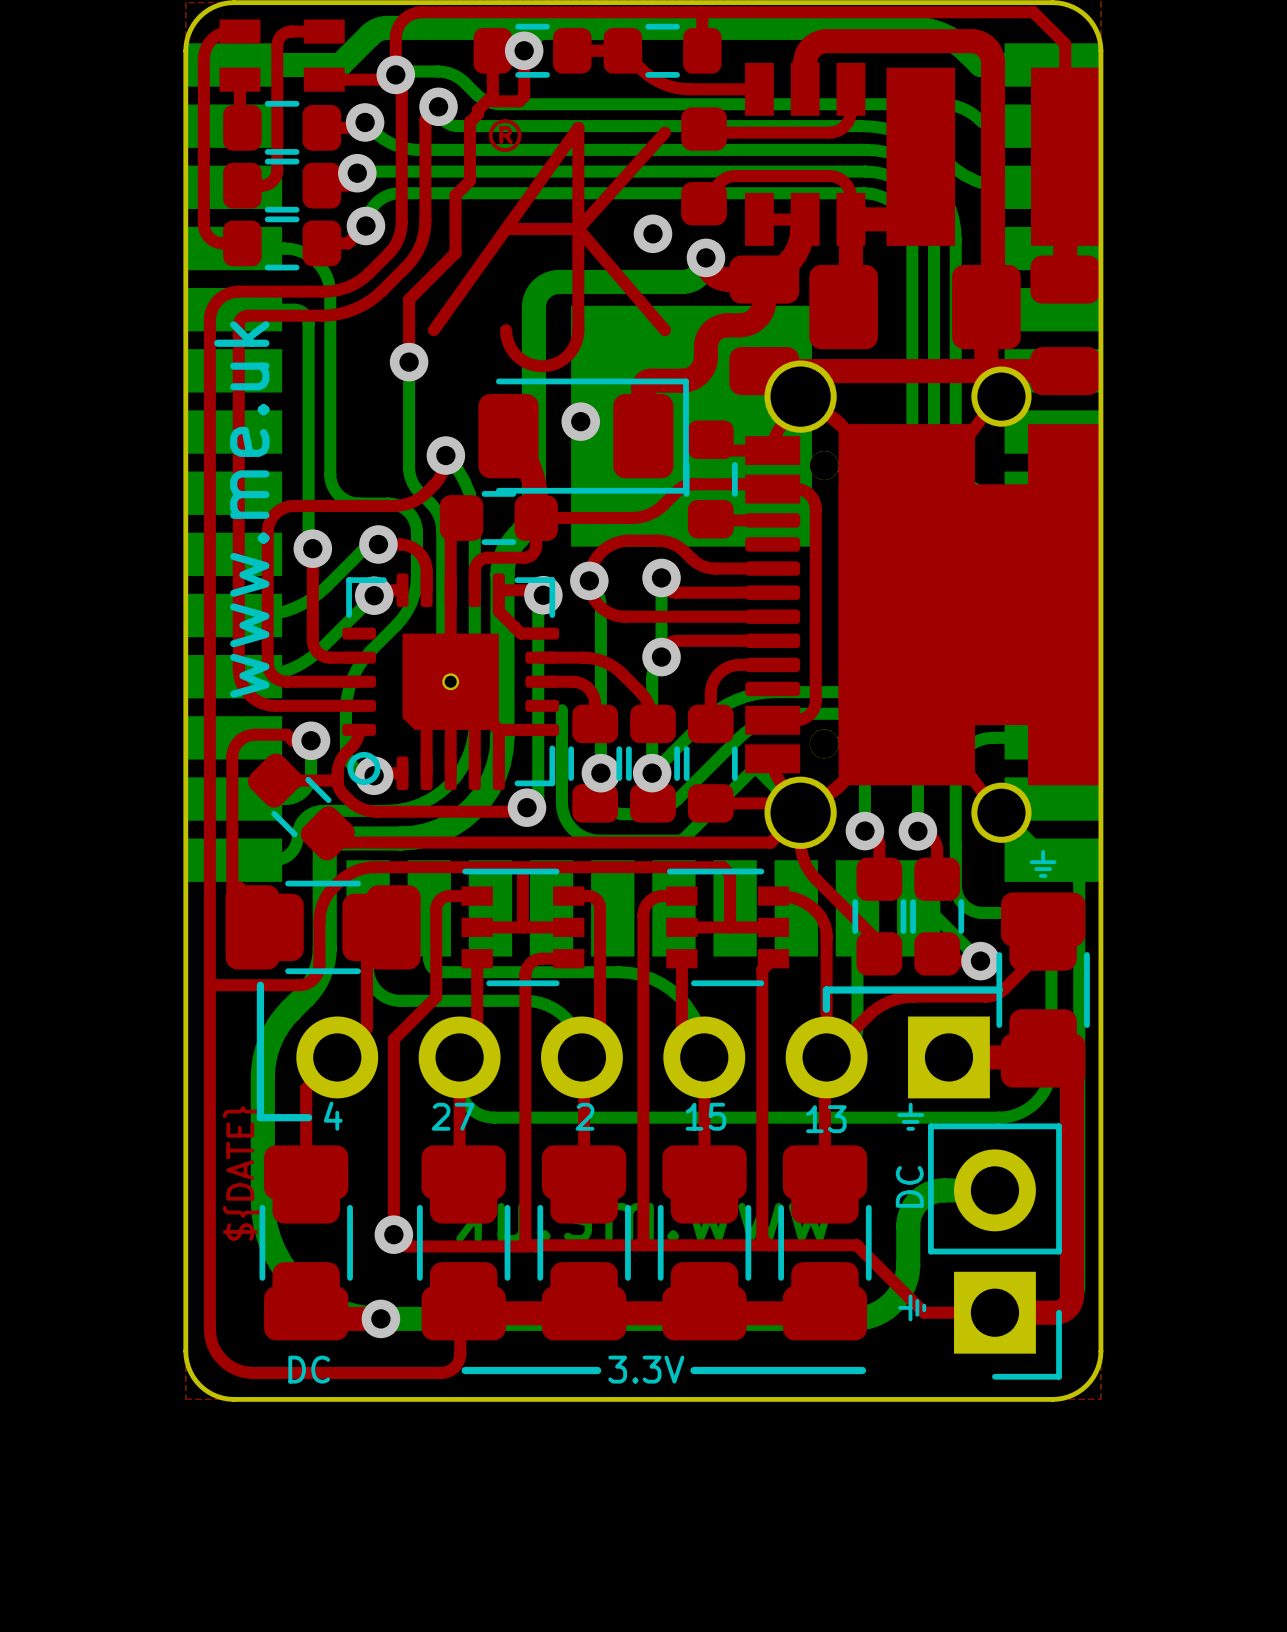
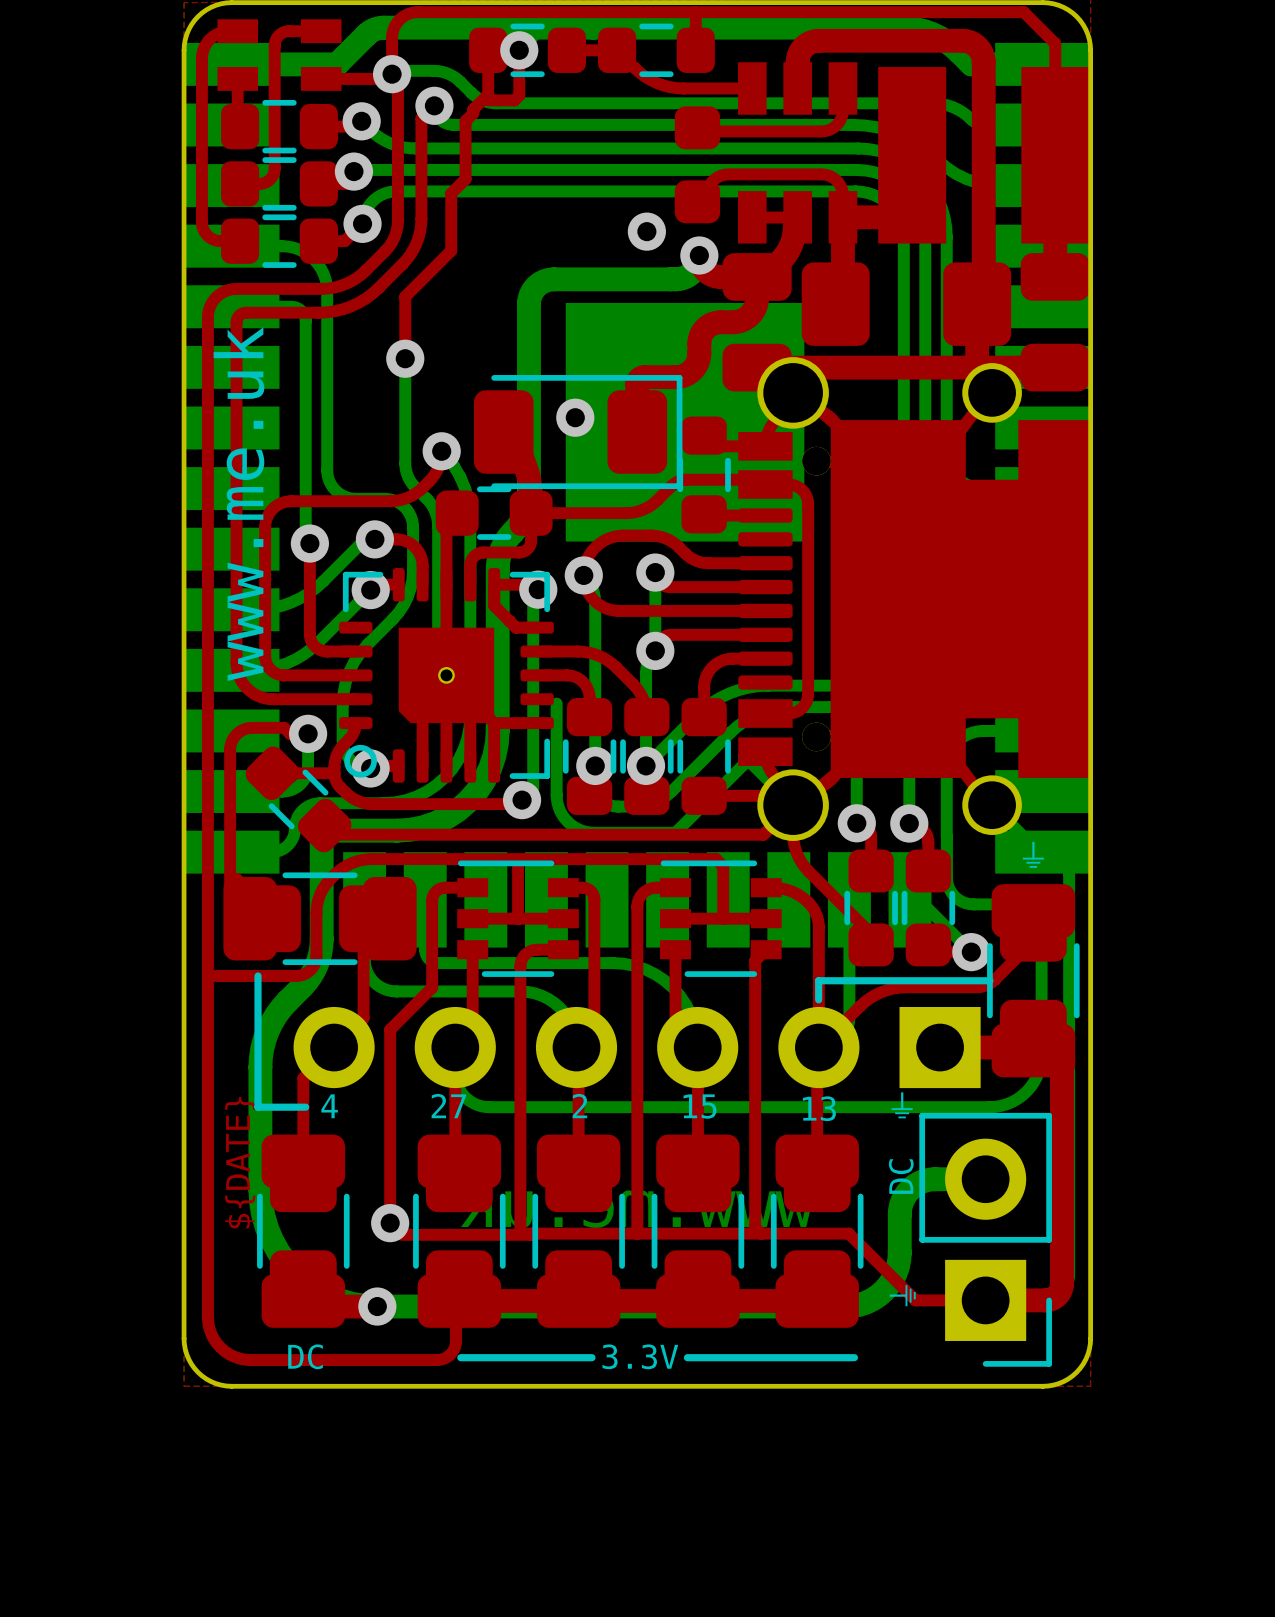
drawing: [427, 119, 672, 373] -> none

